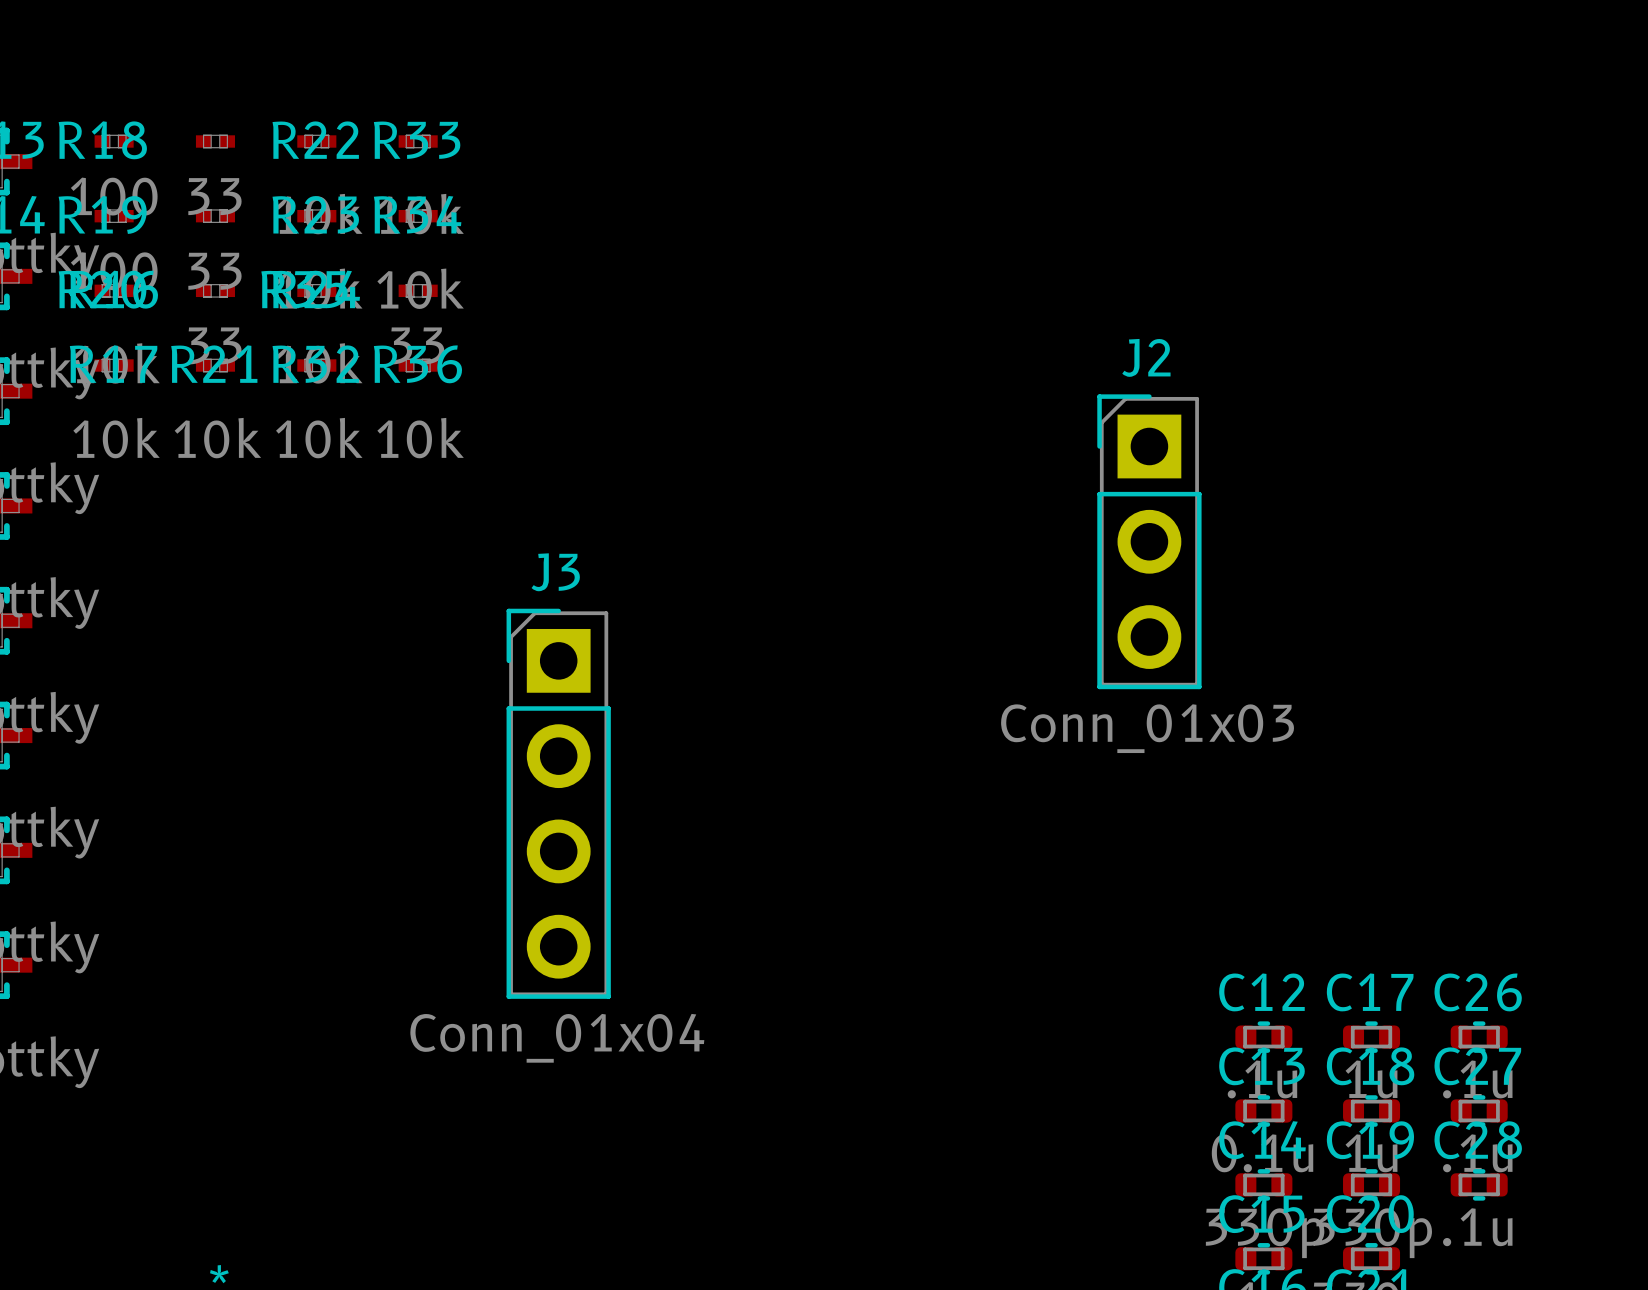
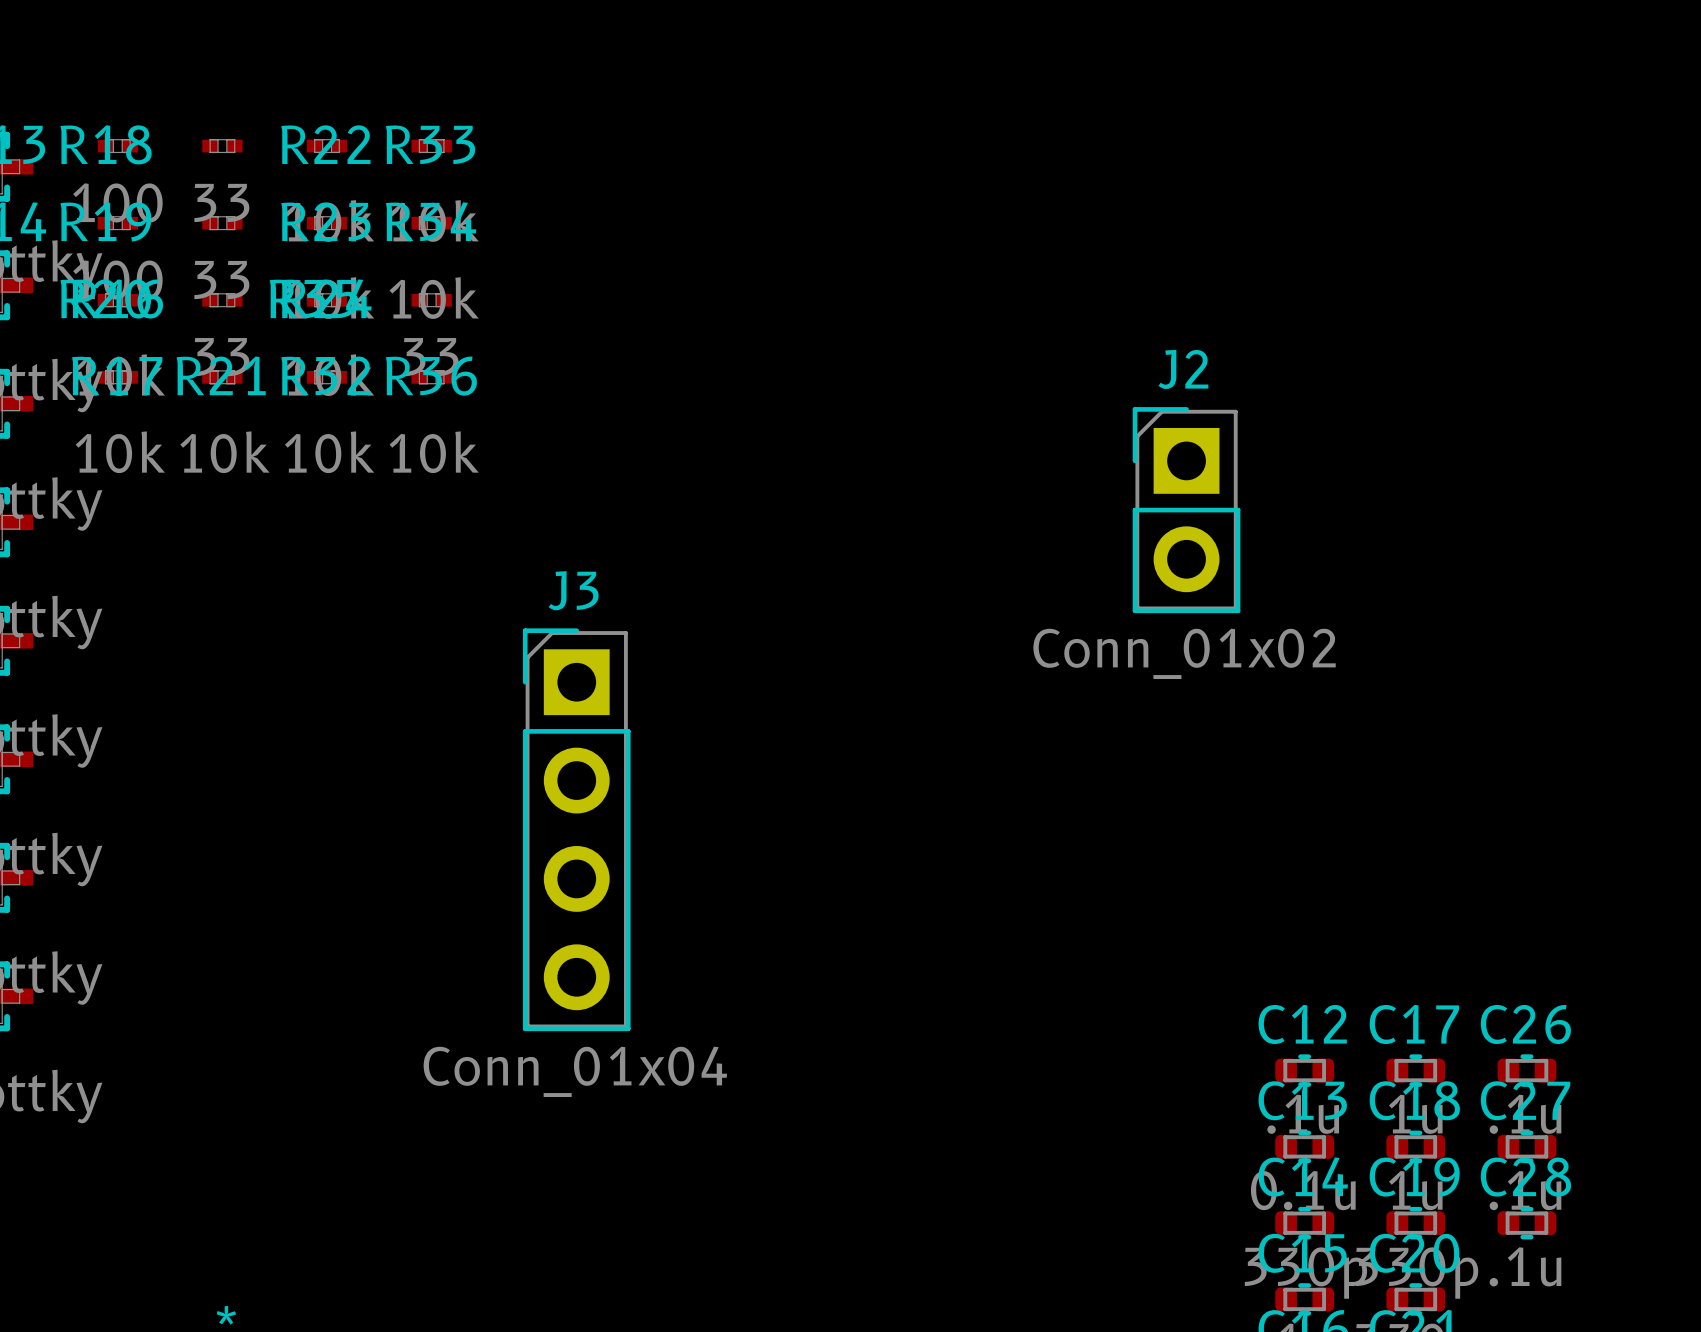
J2 footprint: [1097, 394, 1202, 690] -> [1132, 407, 1241, 614]
J2 value: Conn_01x03 (1147, 728) -> Conn_01x02 (1184, 653)

